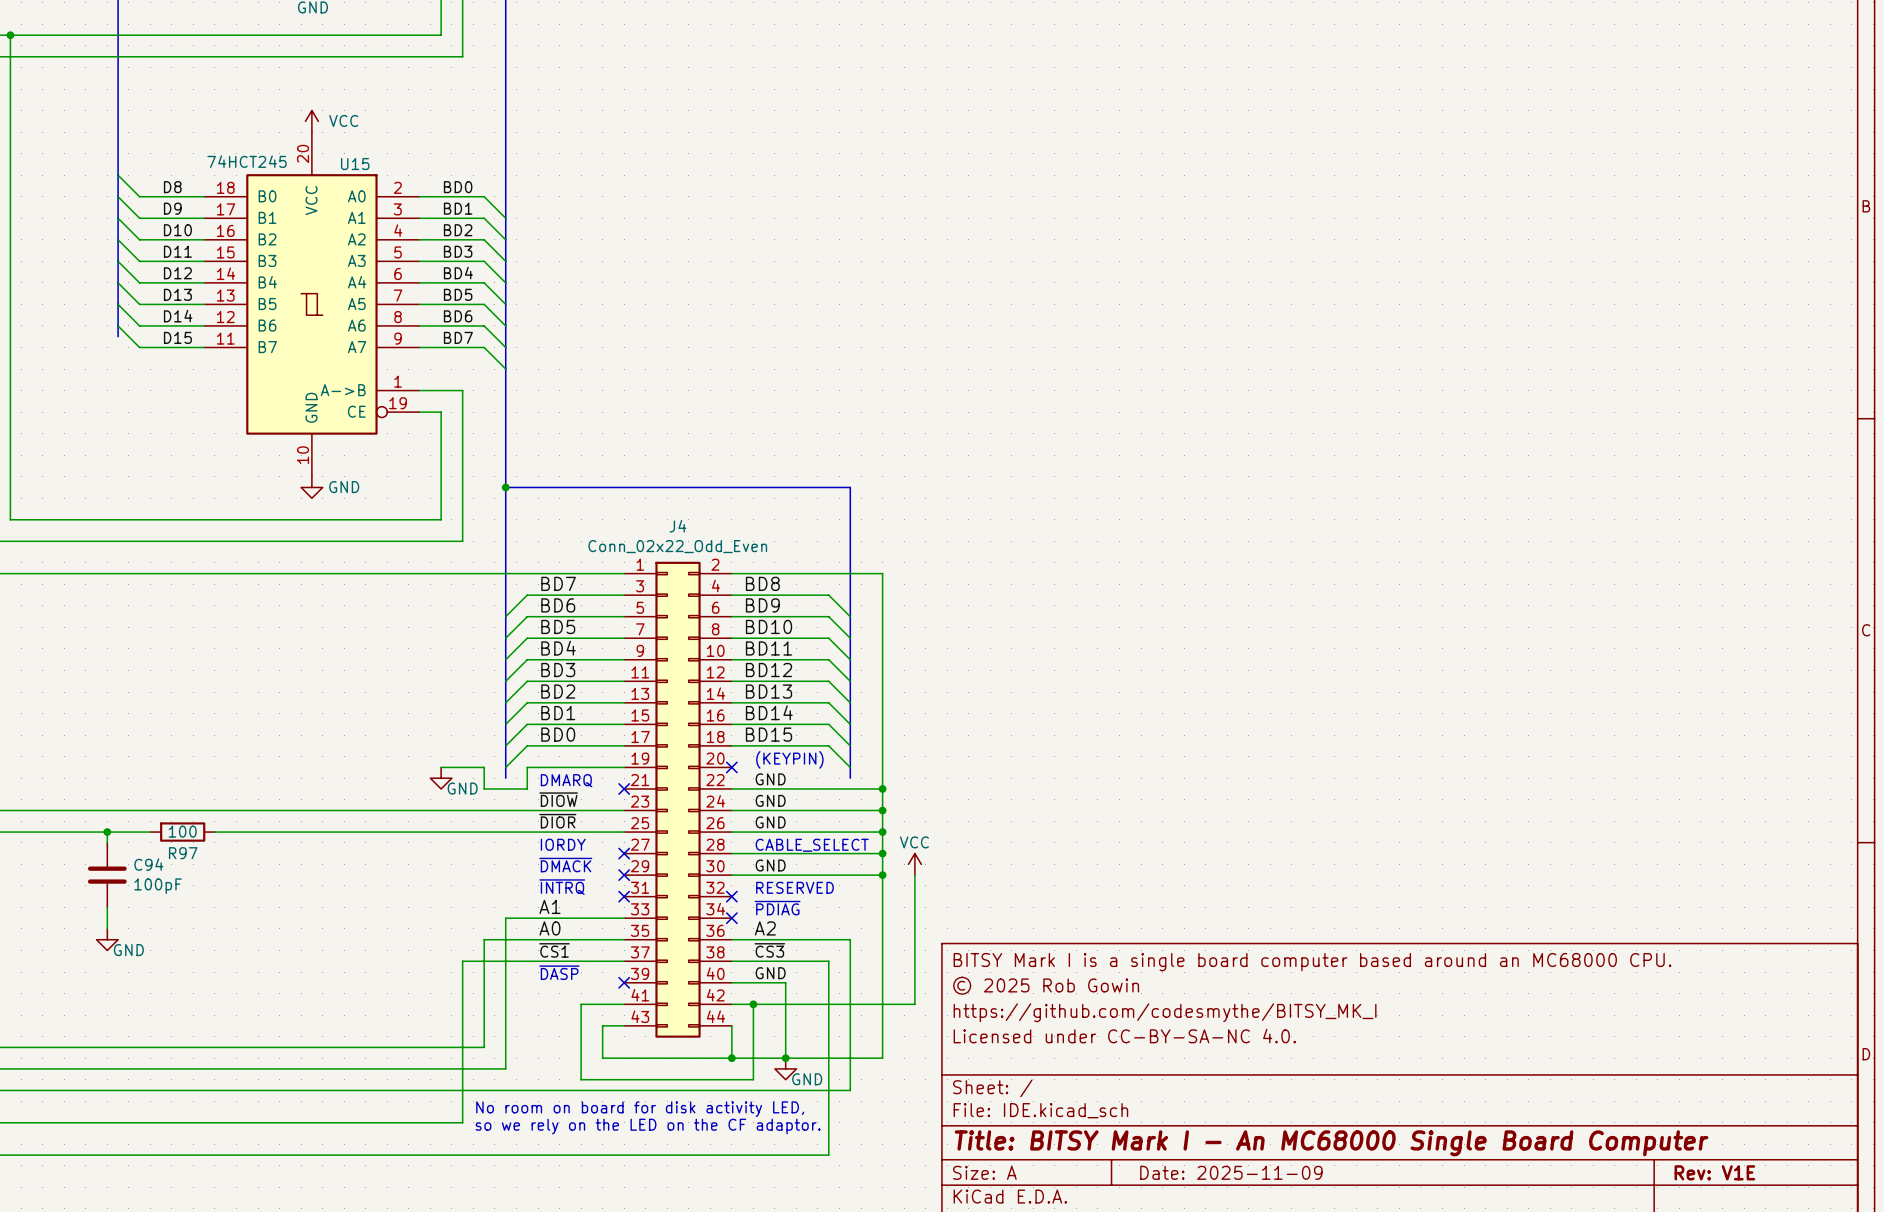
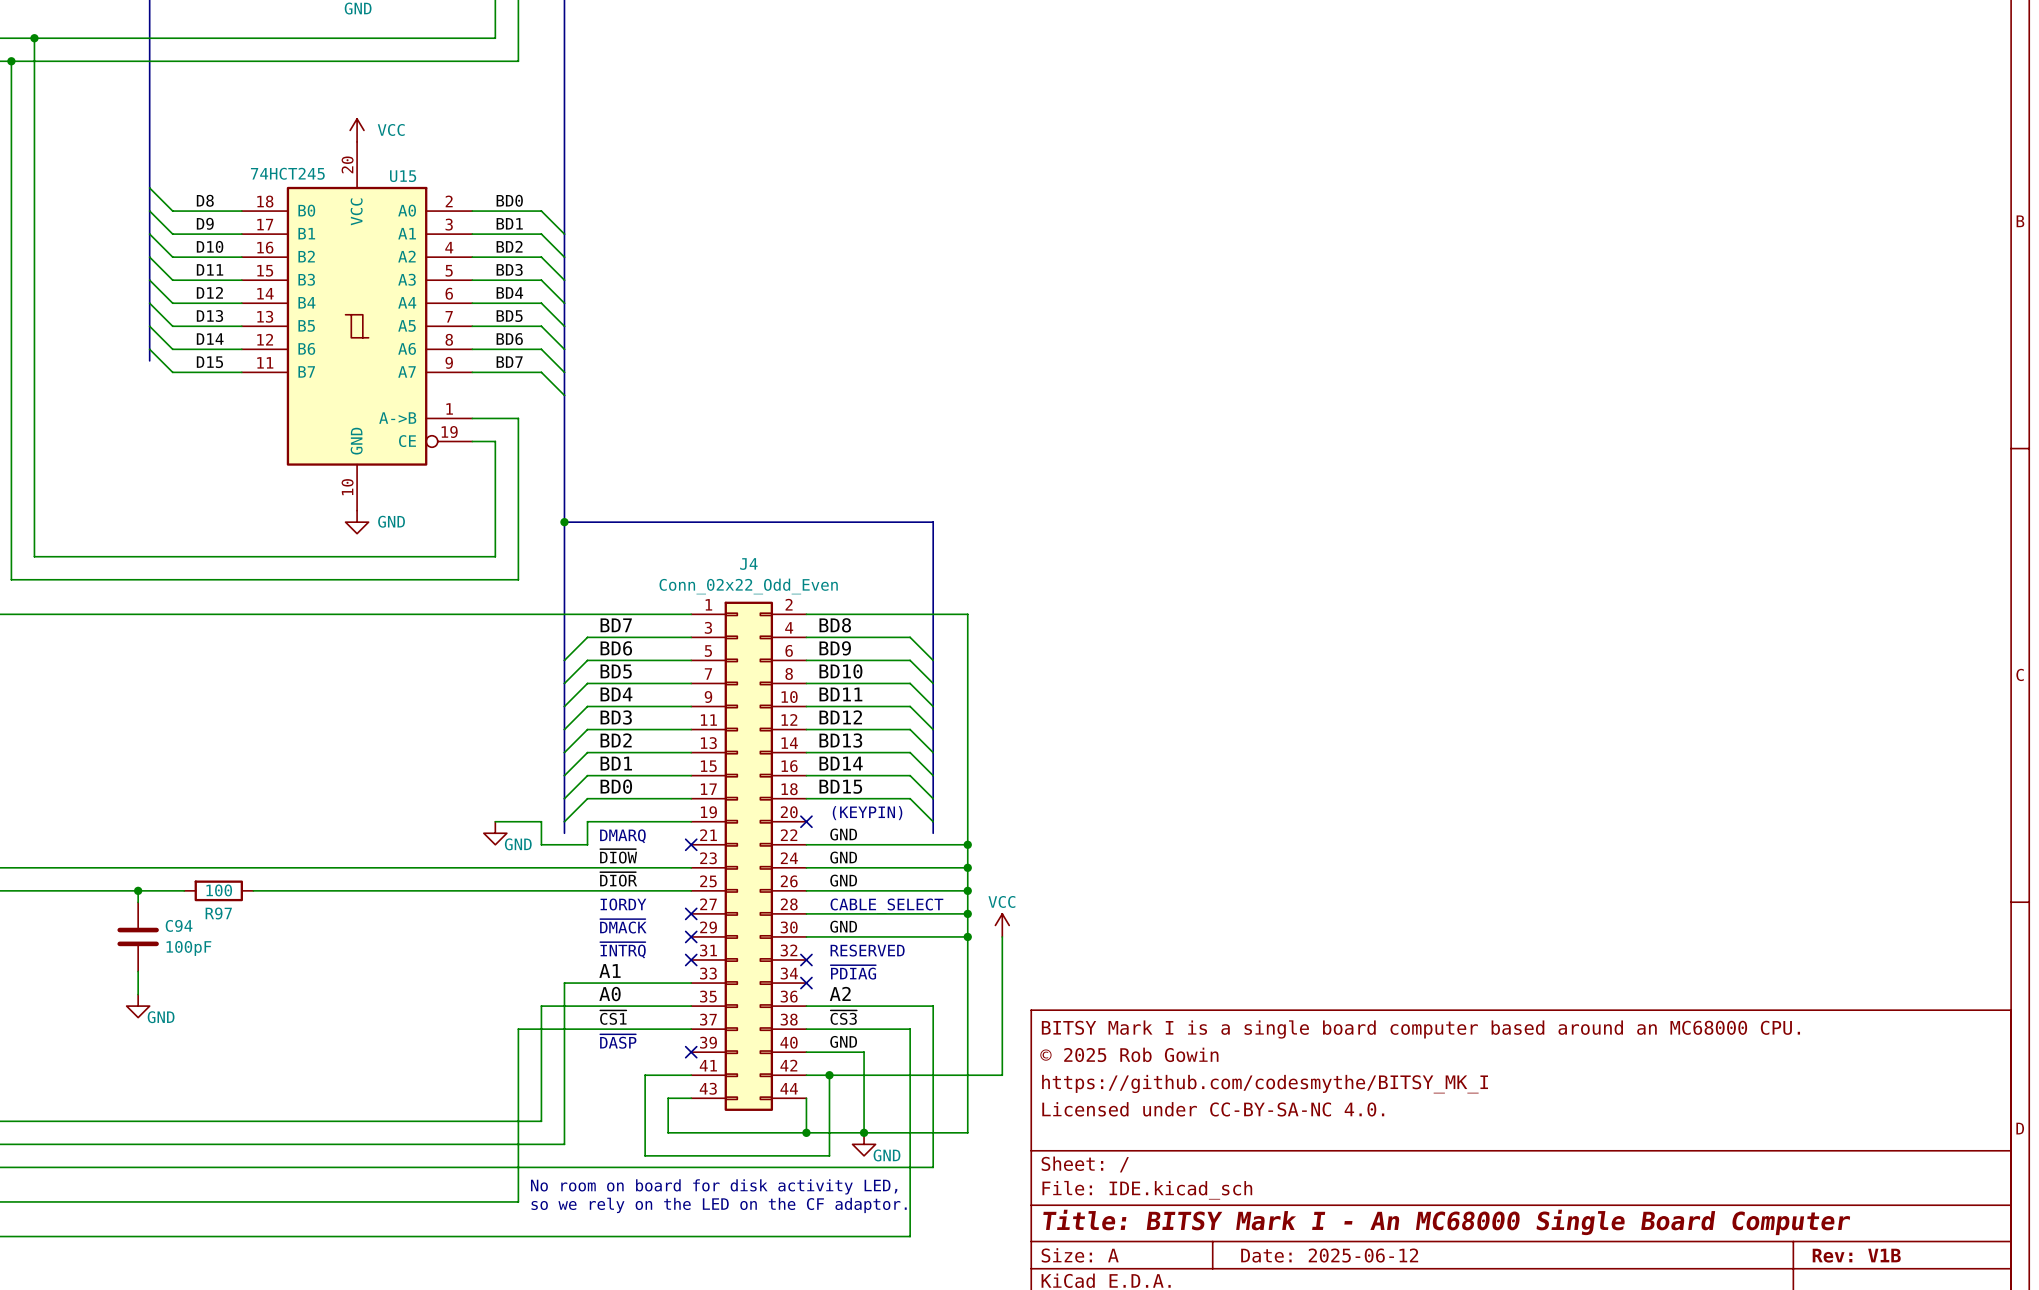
title block: Date: 2025-11-09 (1231, 1172) -> Date: 2025-06-12 (1329, 1255)
title block: Rev: V1E (1714, 1172) -> Rev: V1B (1856, 1255)

